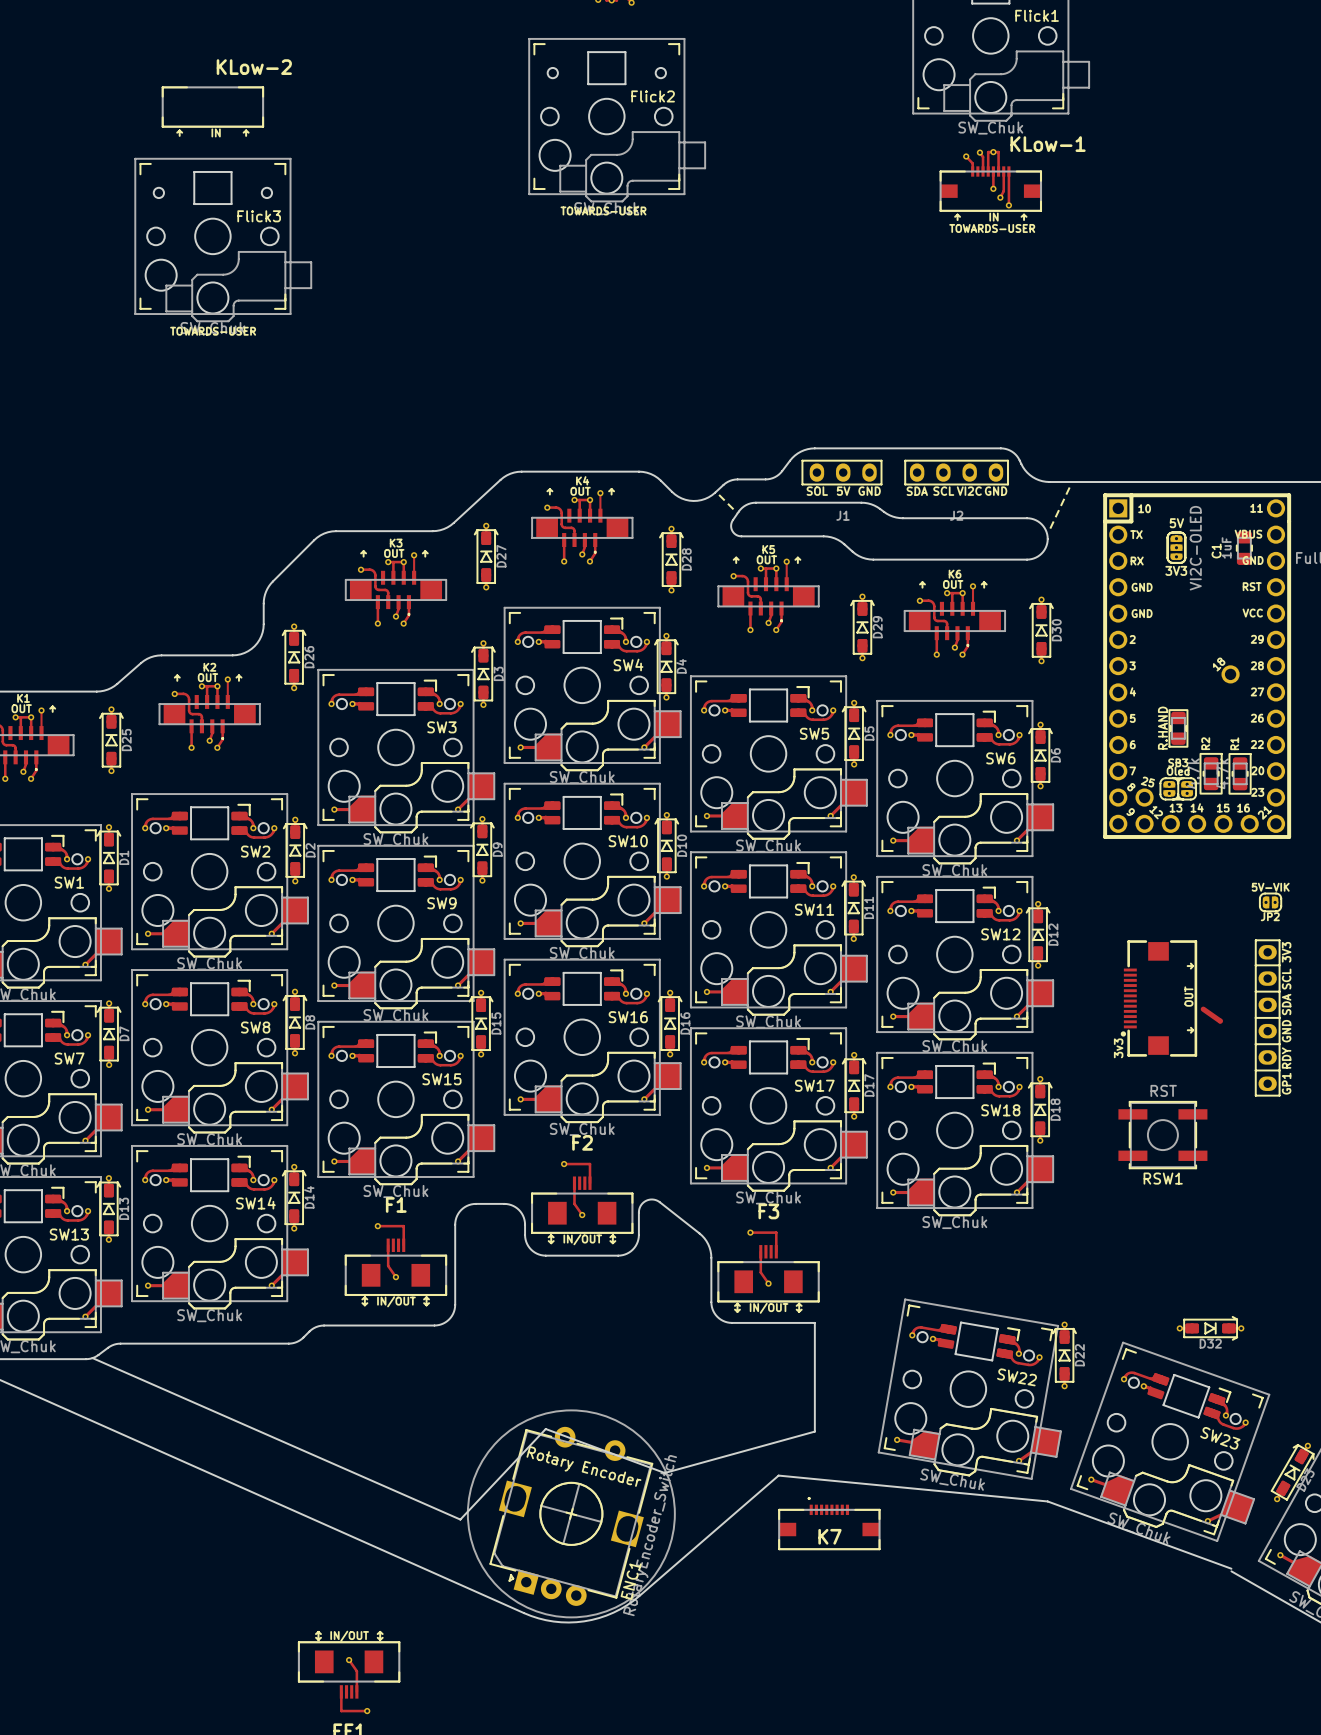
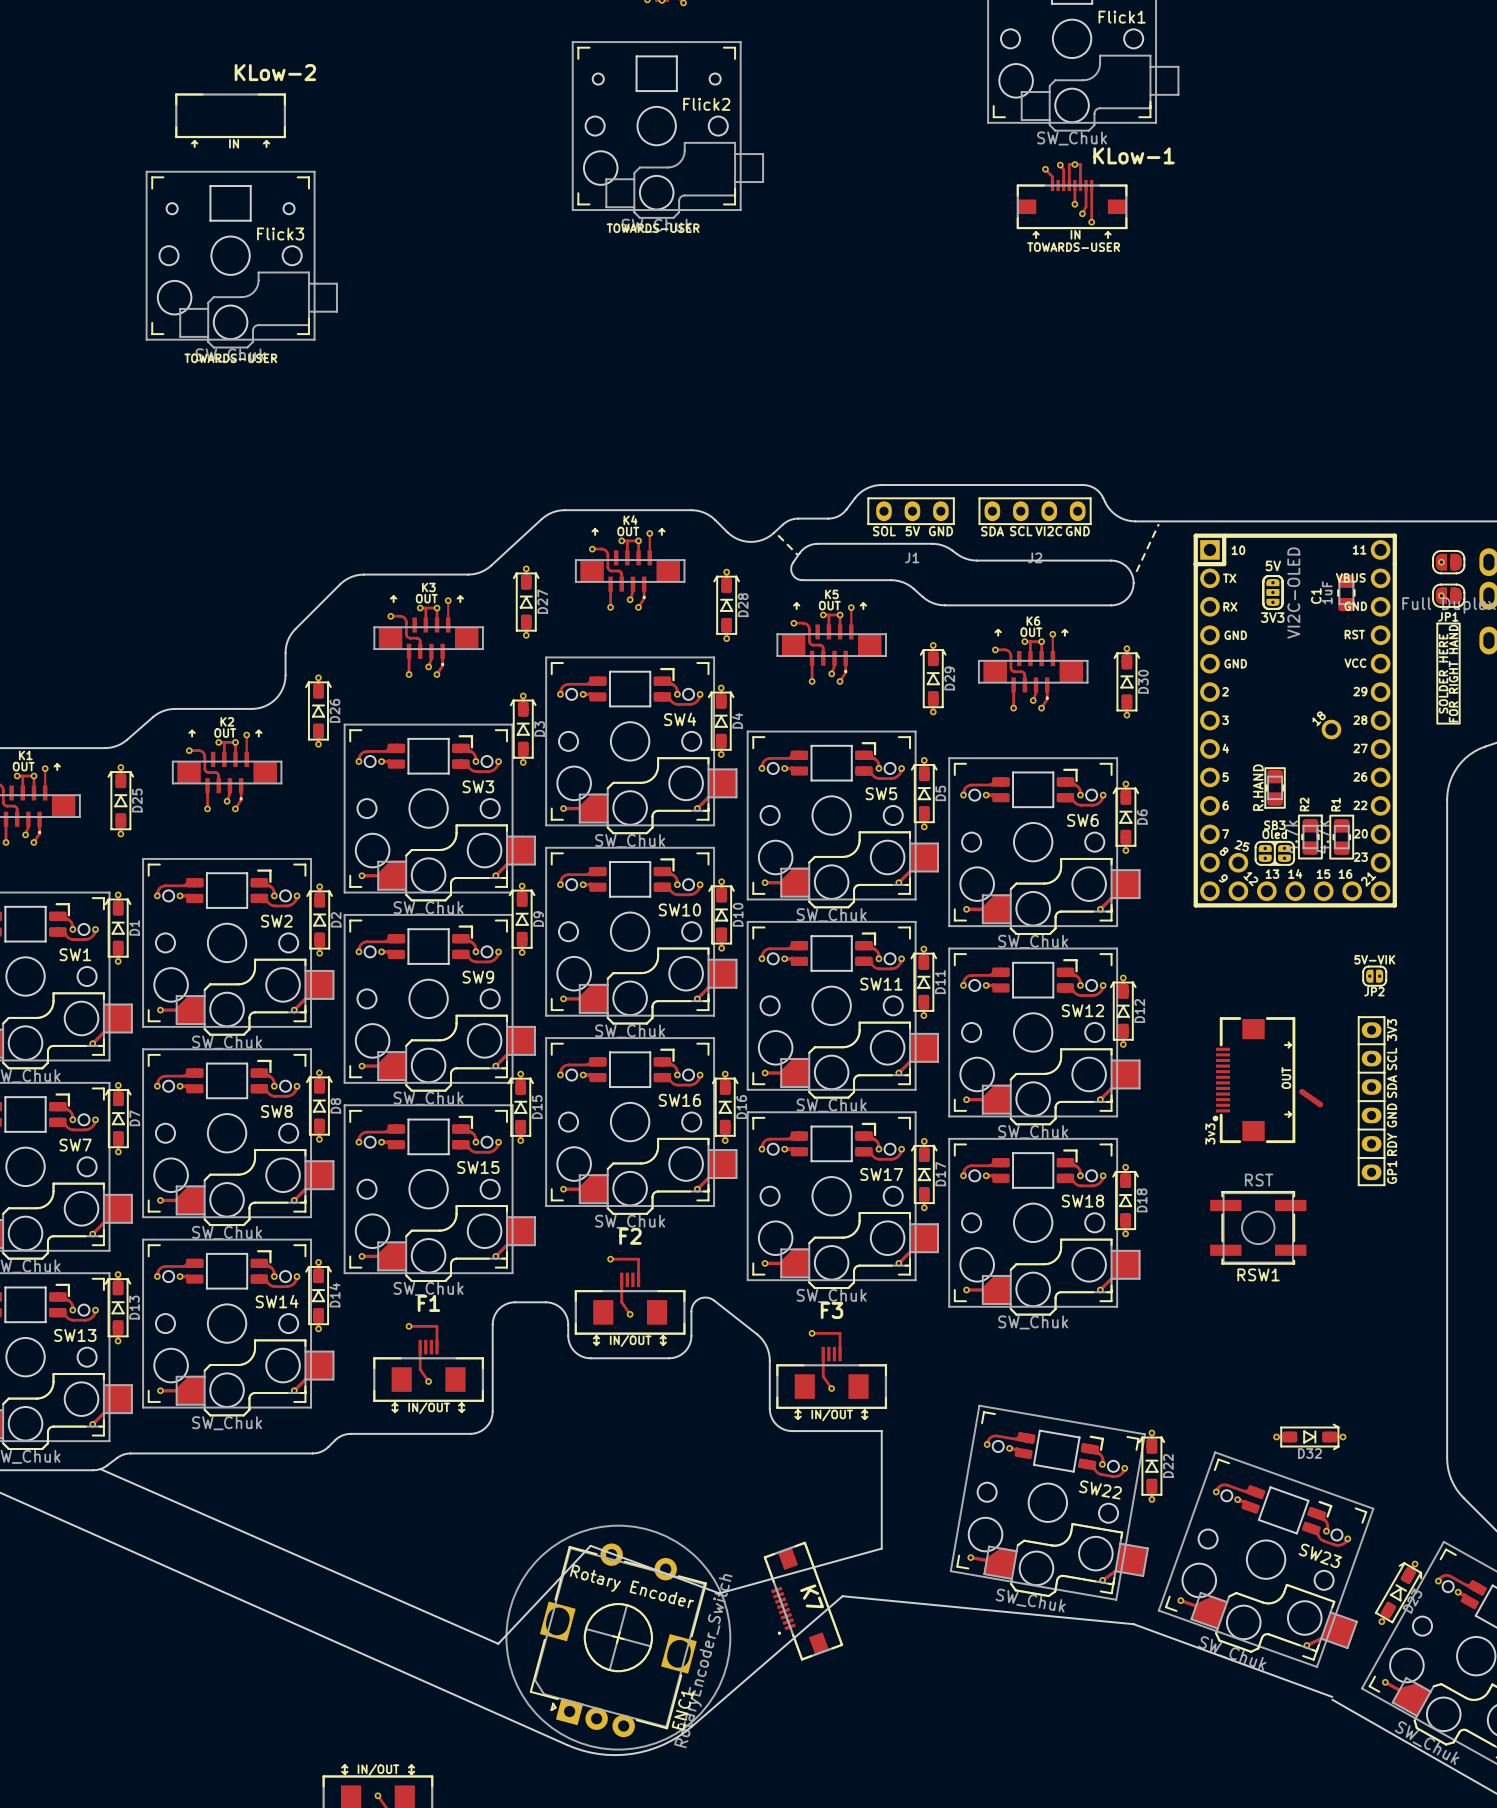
K7 rotation: 0° (829, 1523) -> 110° counterclockwise (803, 1601)
K7 position: (829, 1523) -> (803, 1601)

